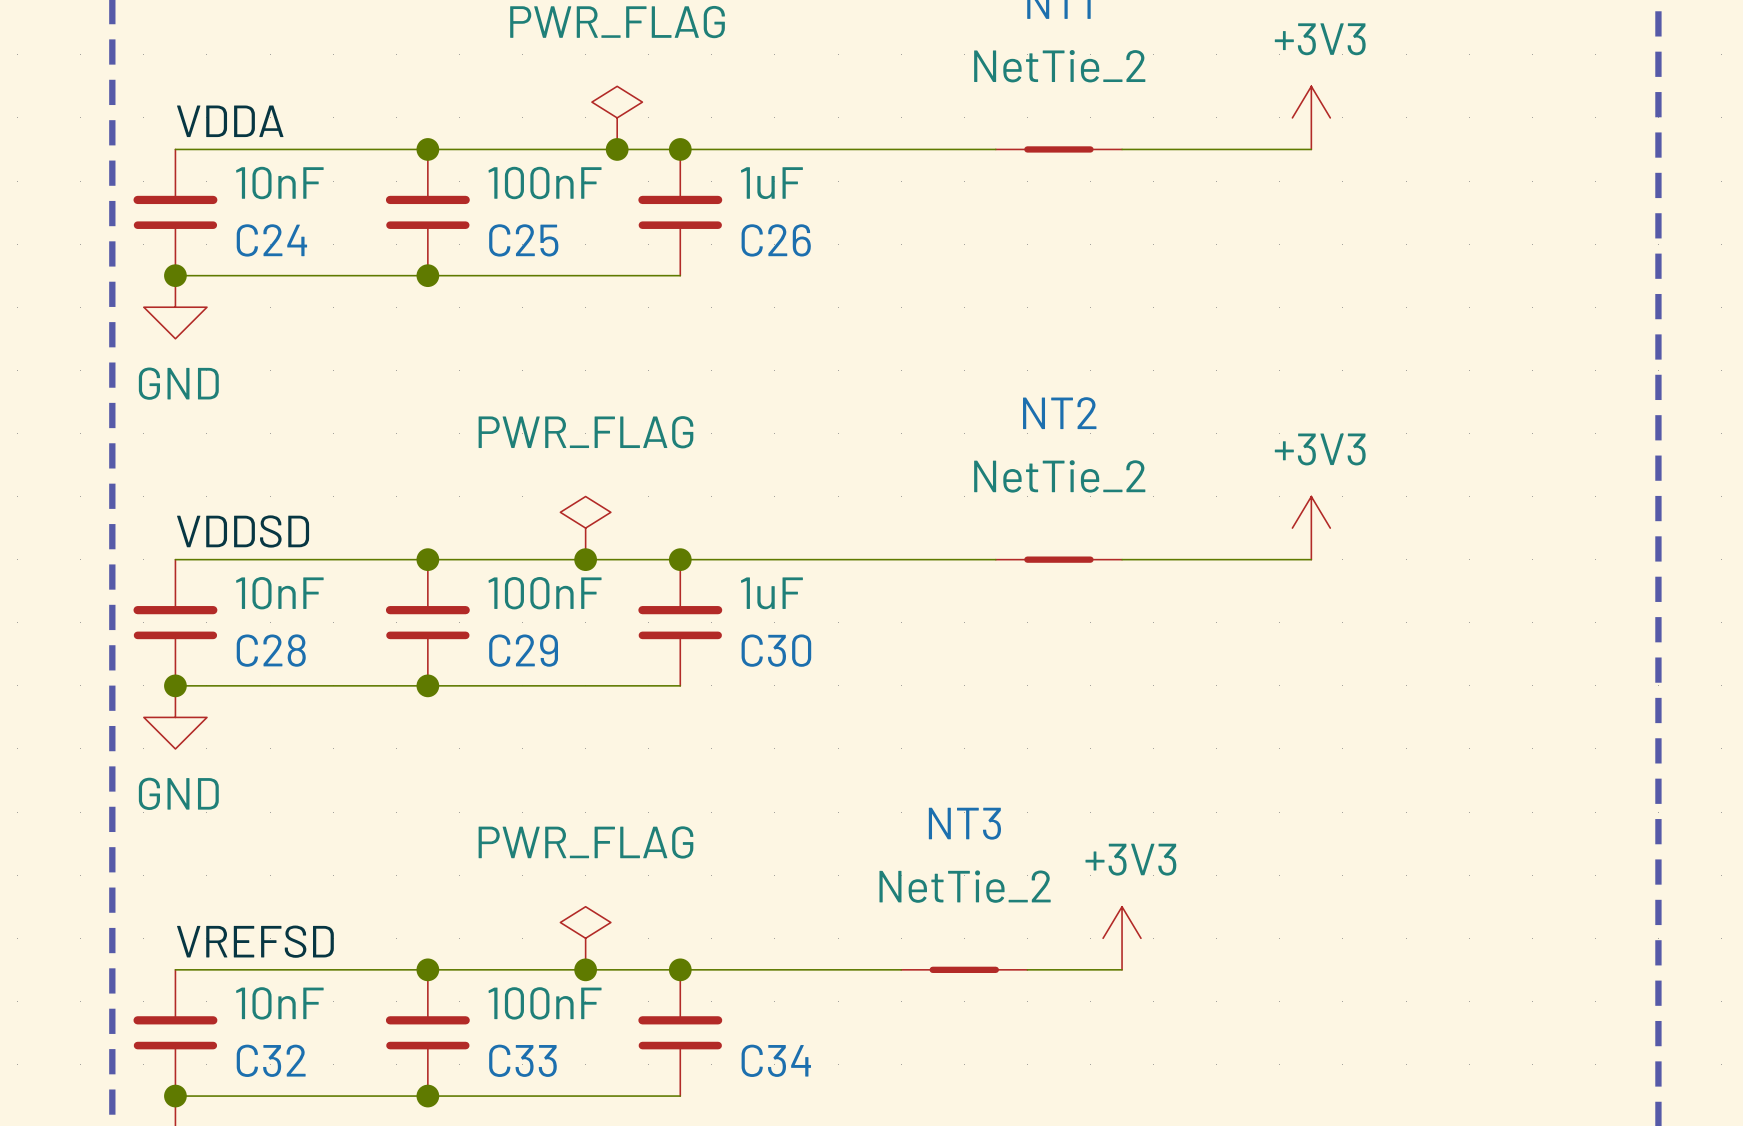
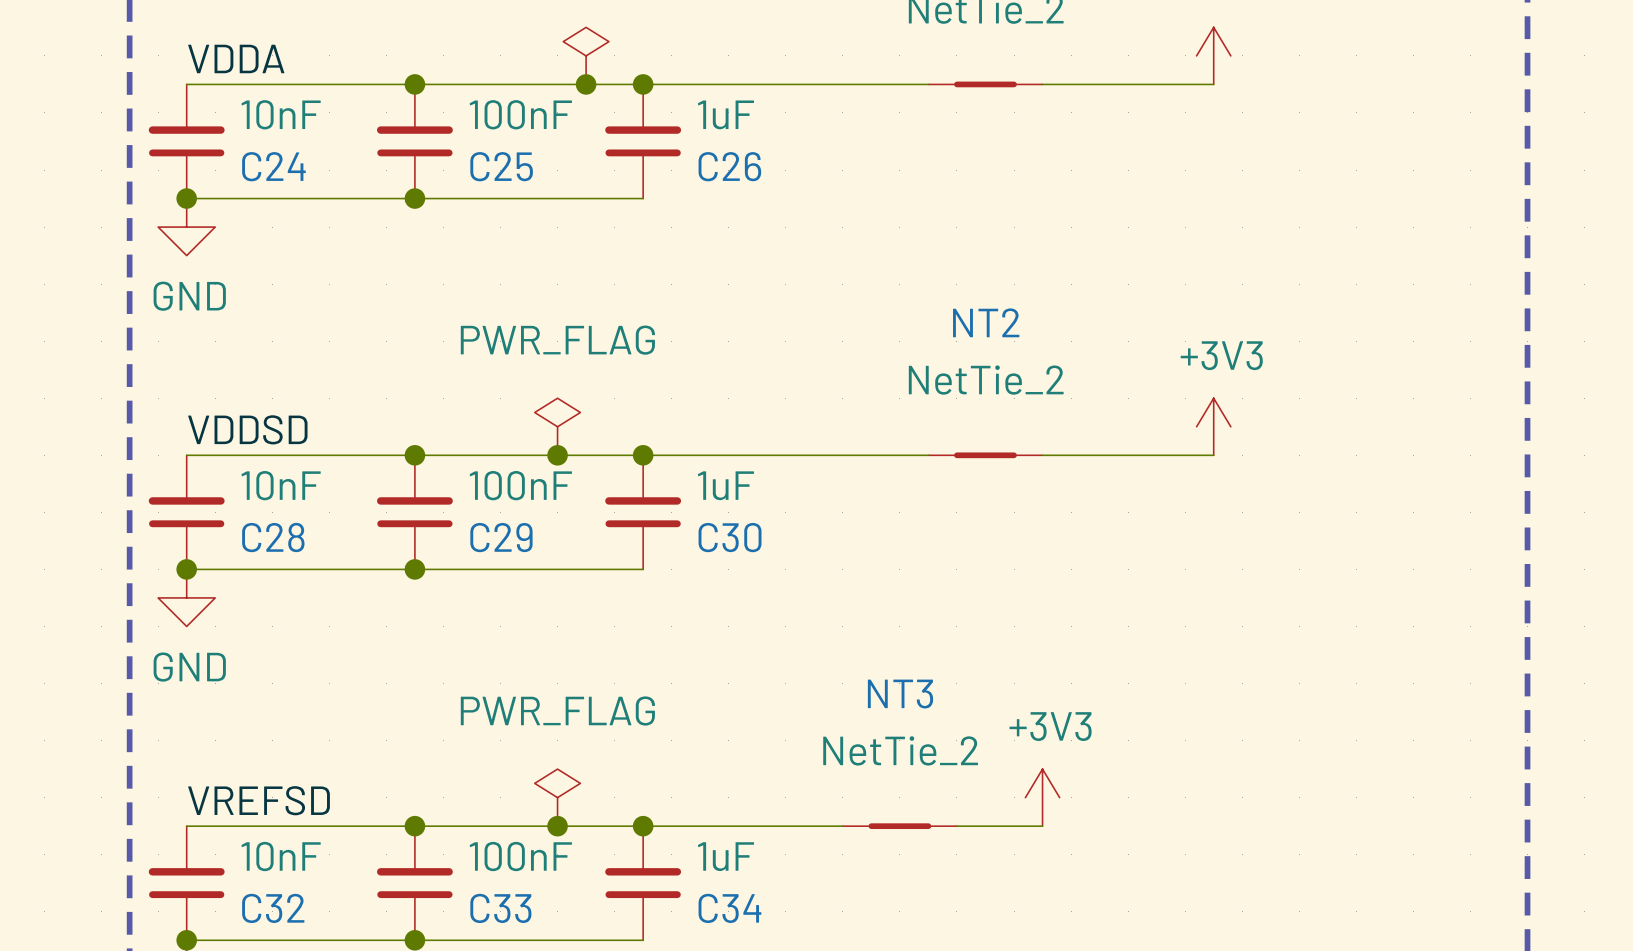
C34 value: none -> 1uF (725, 856)

